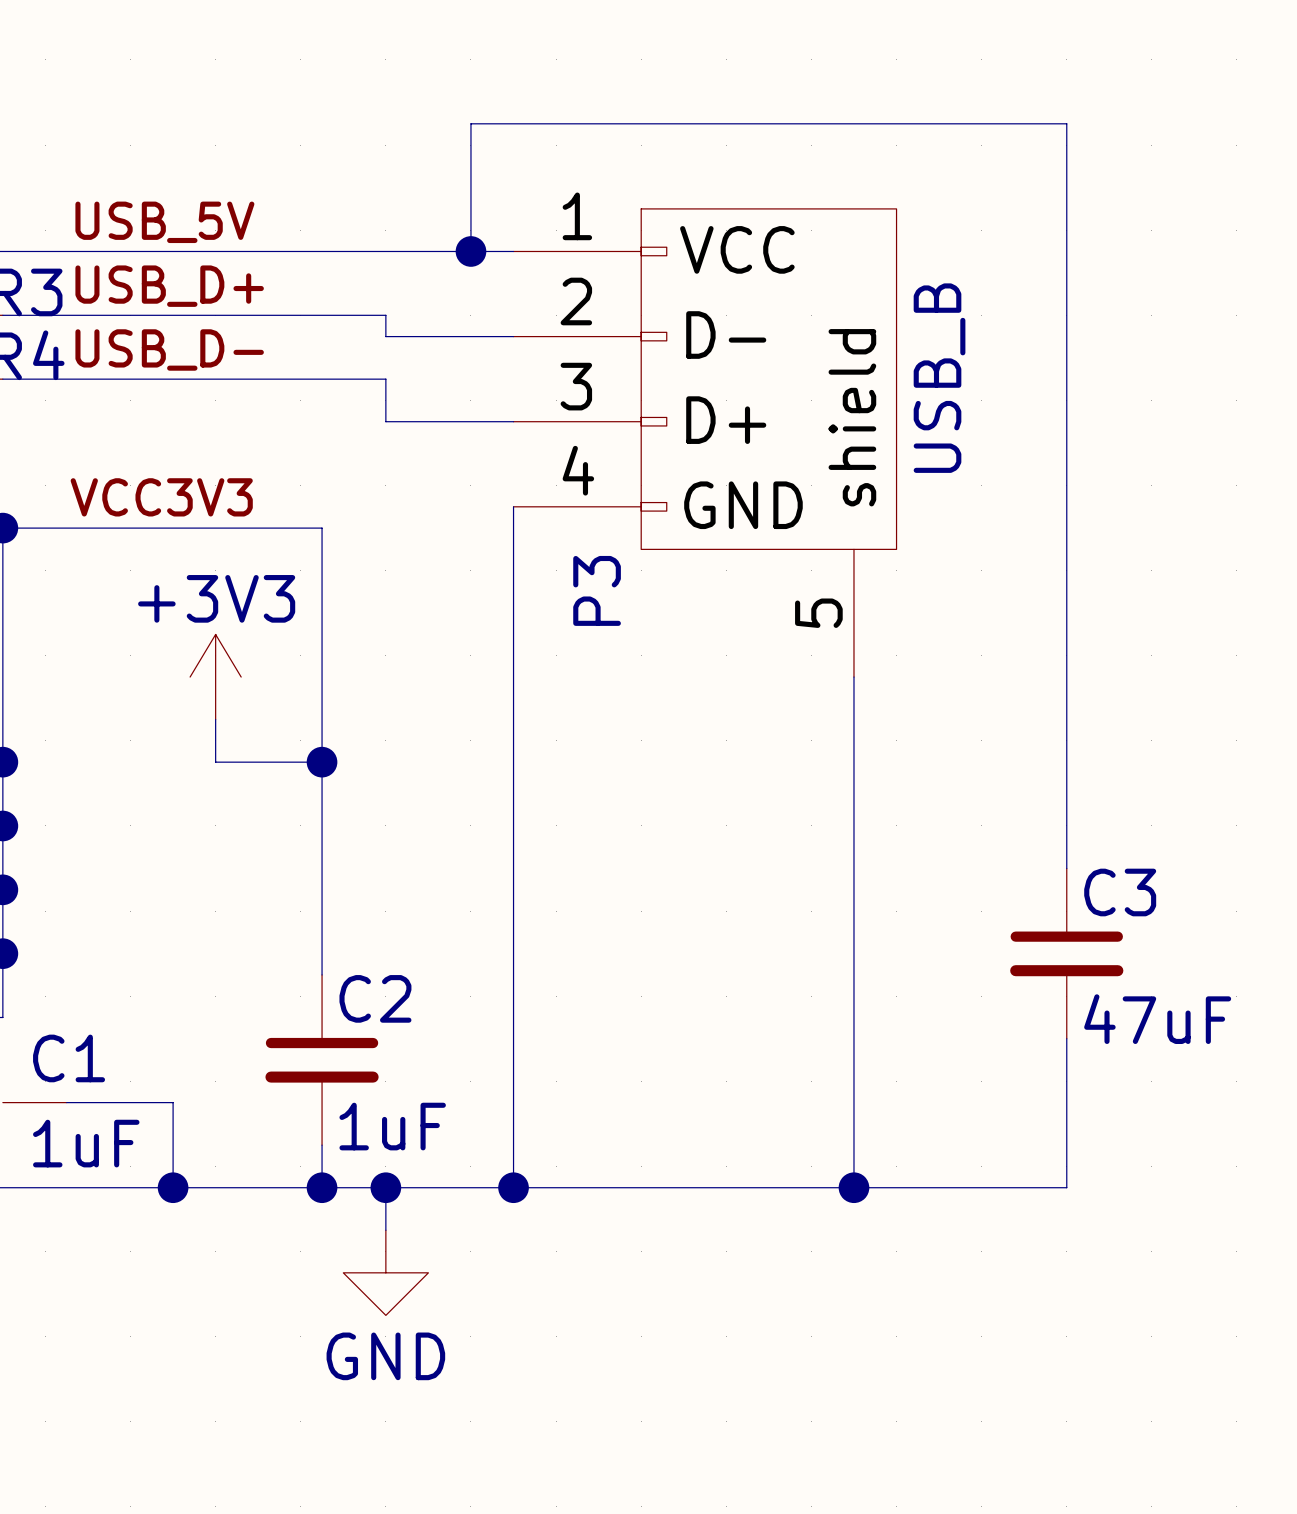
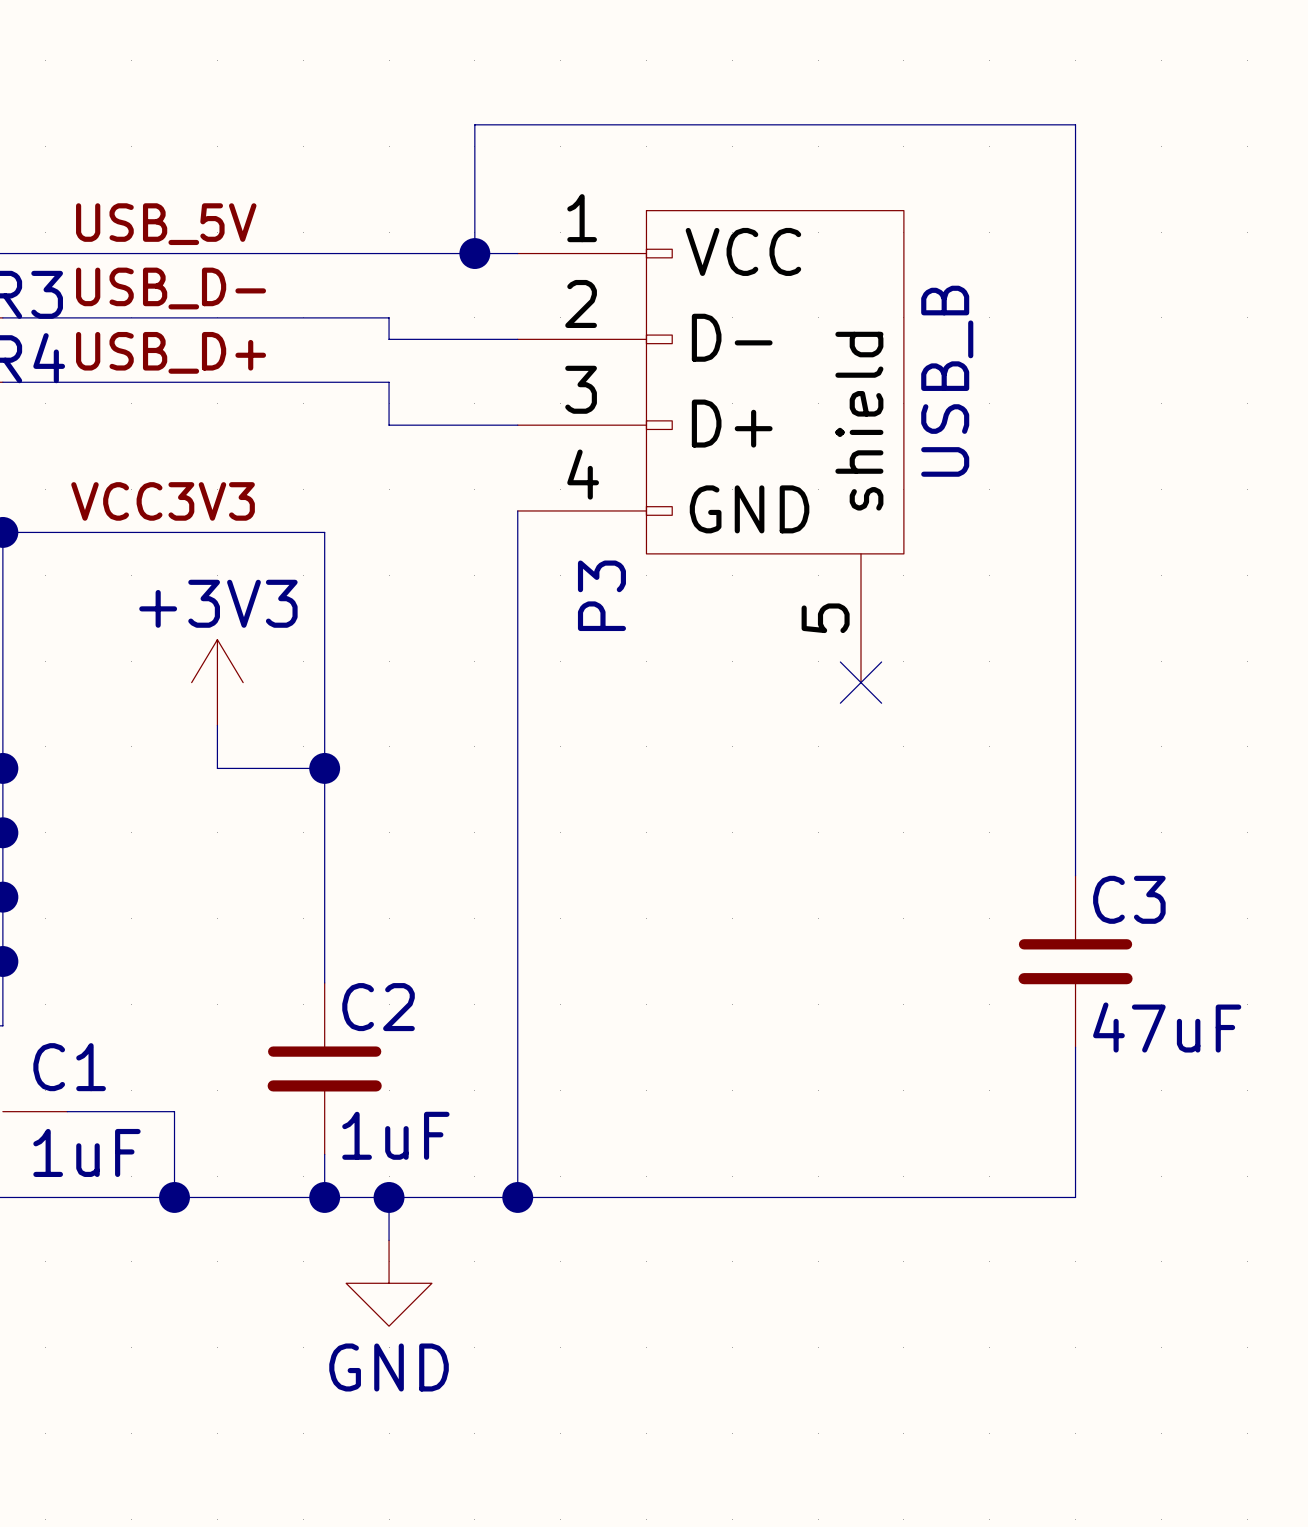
label: USB_D+ (169, 286) -> USB_D- (171, 288)
label: USB_D- (169, 349) -> USB_D+ (171, 352)
wire: (853, 677) (853, 1187) -> none
no-connect mark: none -> (861, 682)
junction: (853, 1187) -> none

